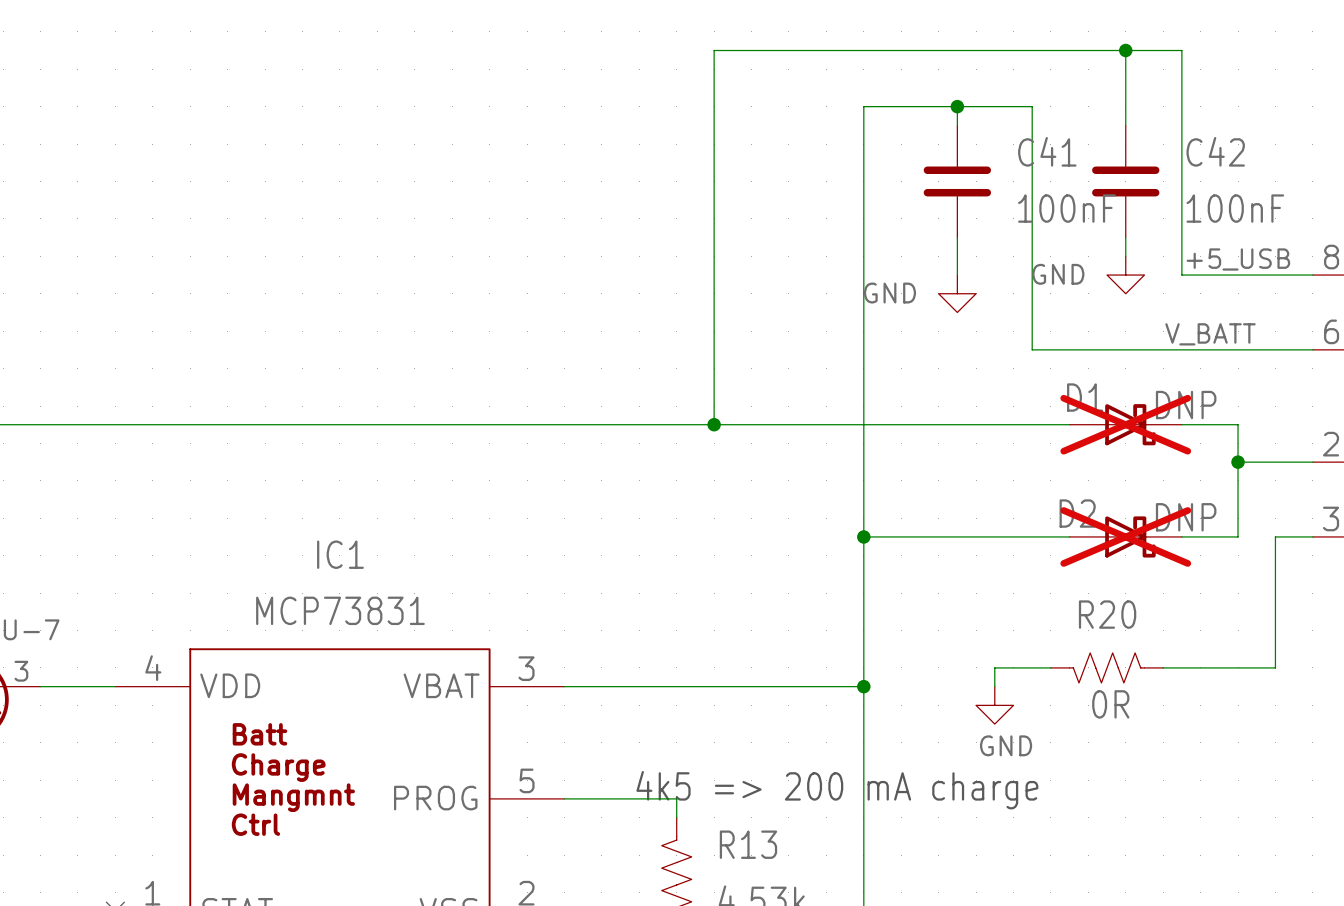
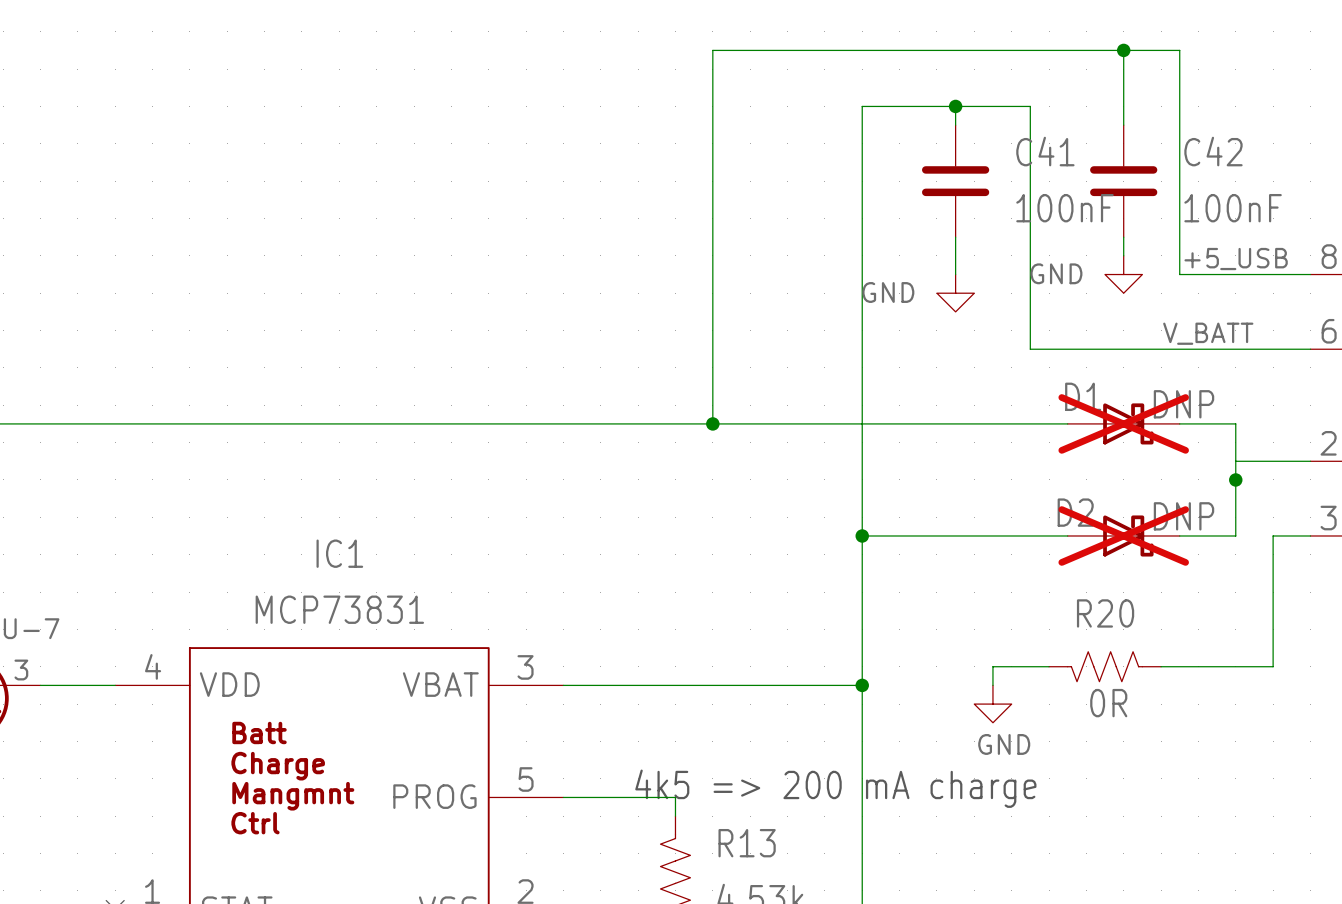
junction position: (1238, 462) -> (1235, 479)

